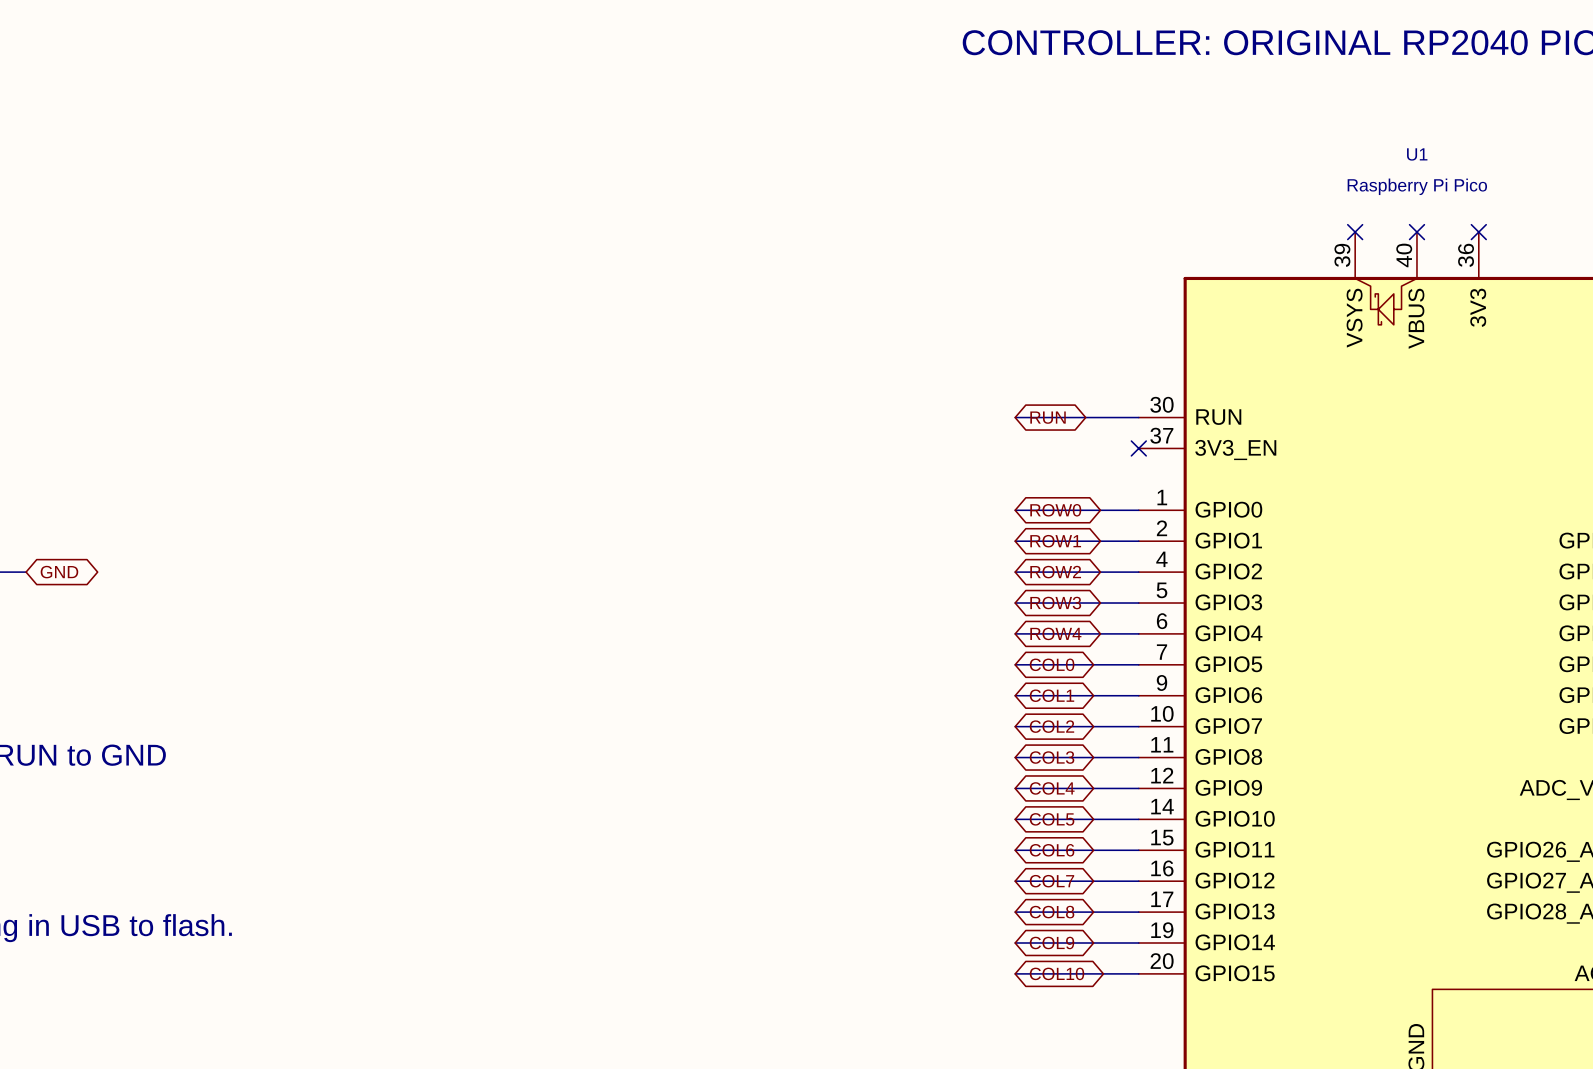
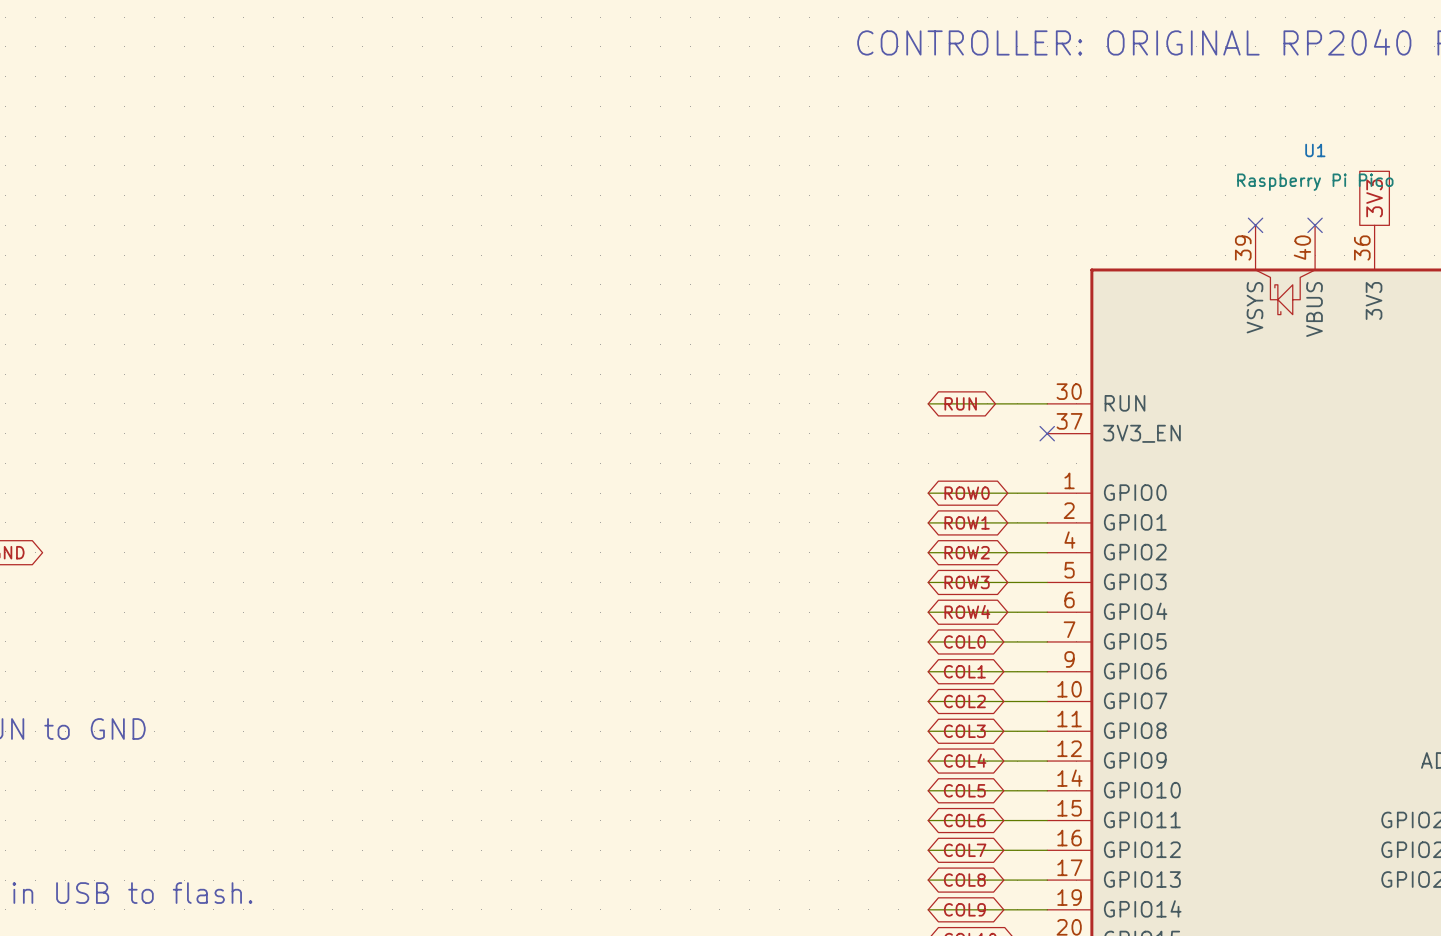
global label: none -> 3V3 (1374, 198)
no-connect mark: (1478, 232) -> none

